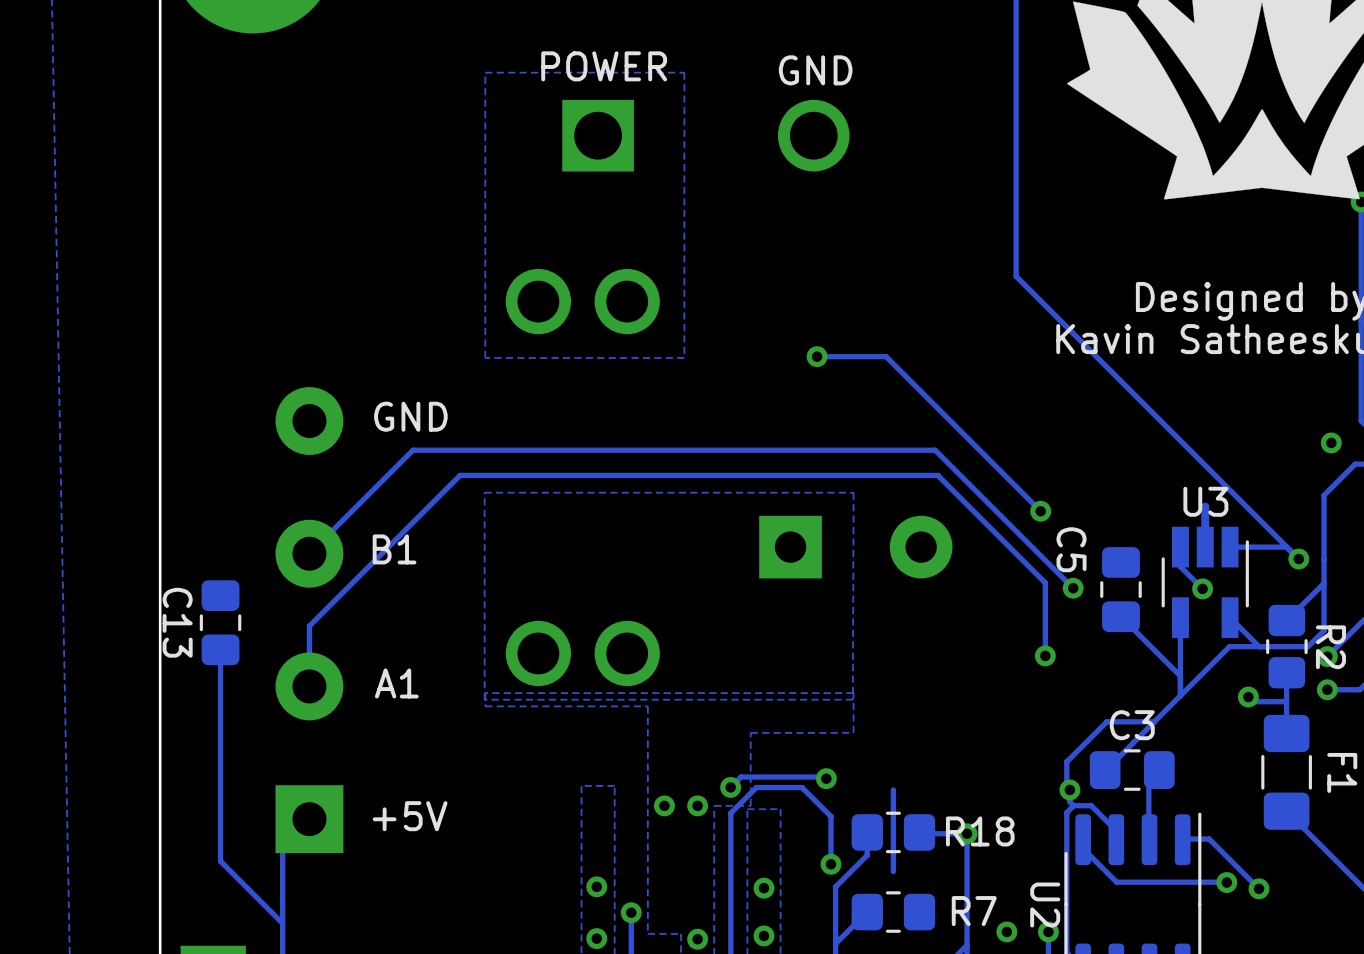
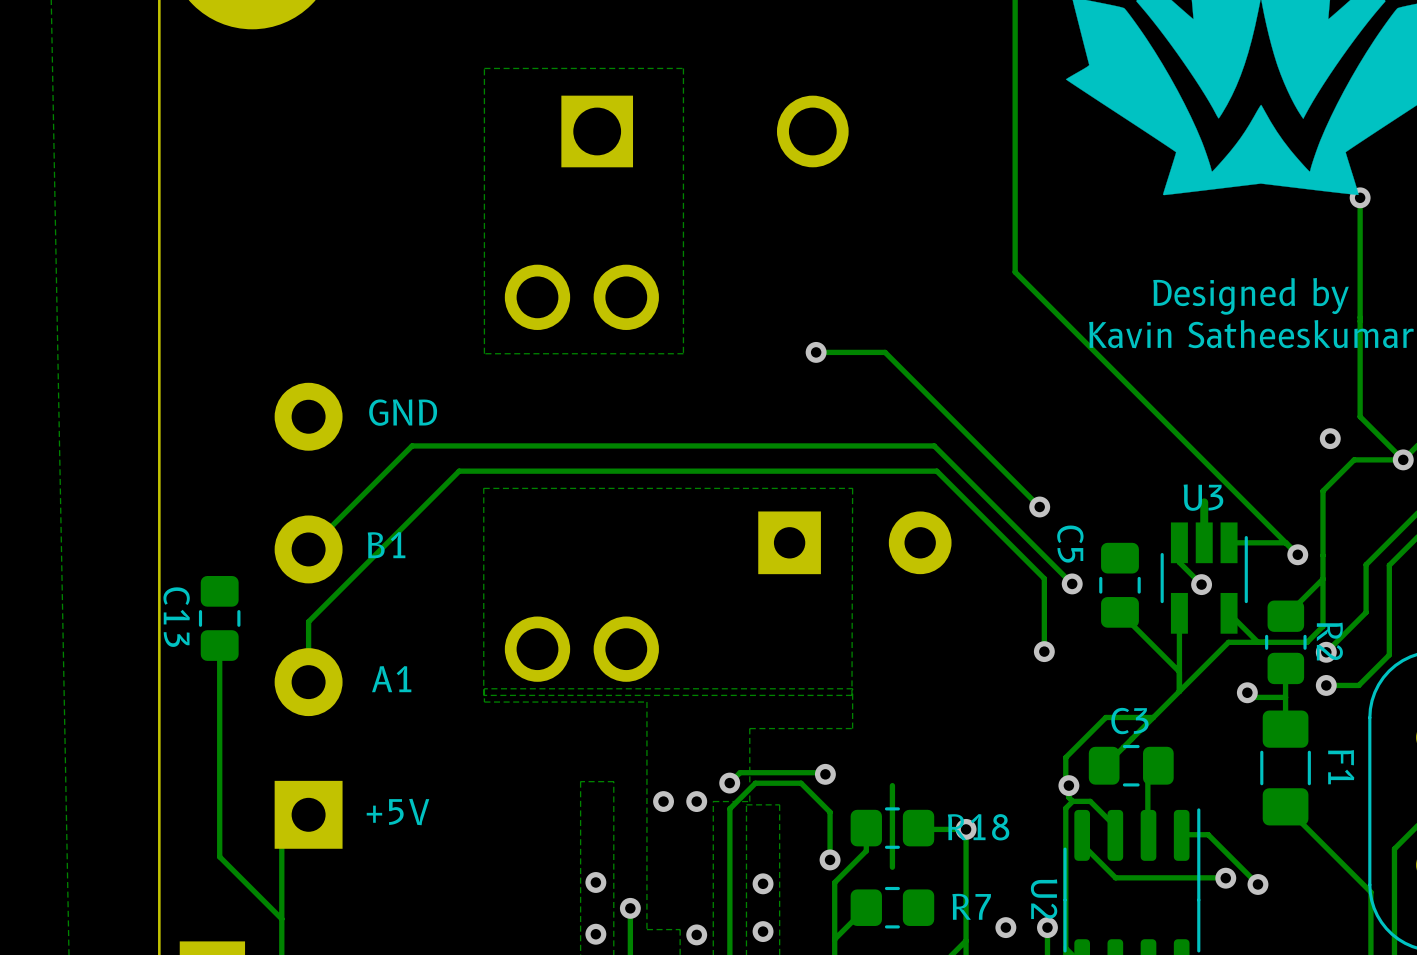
text: POWER (604, 66) -> none
text: GND (815, 70) -> none

